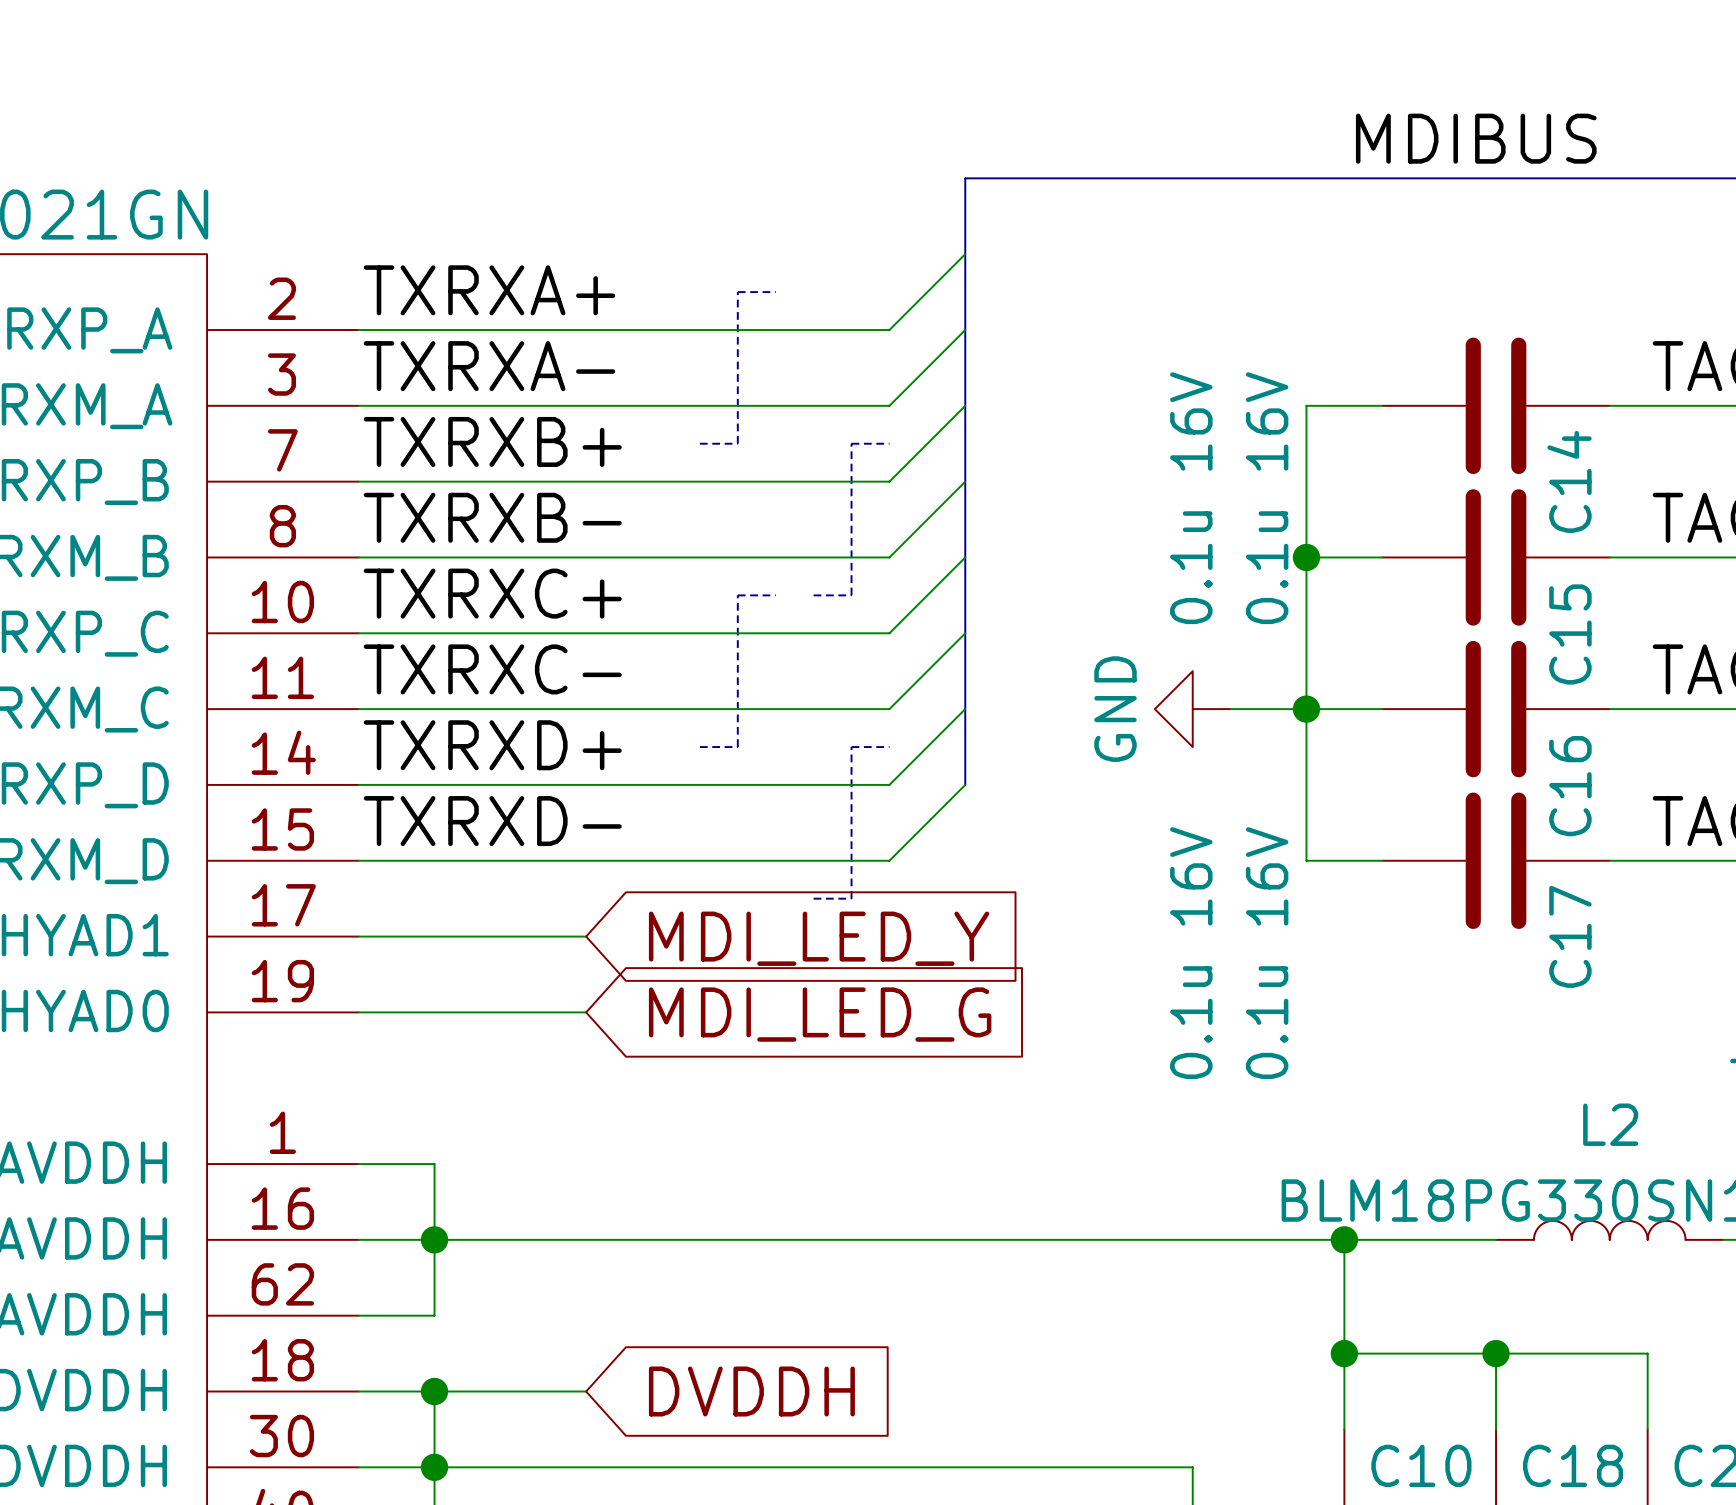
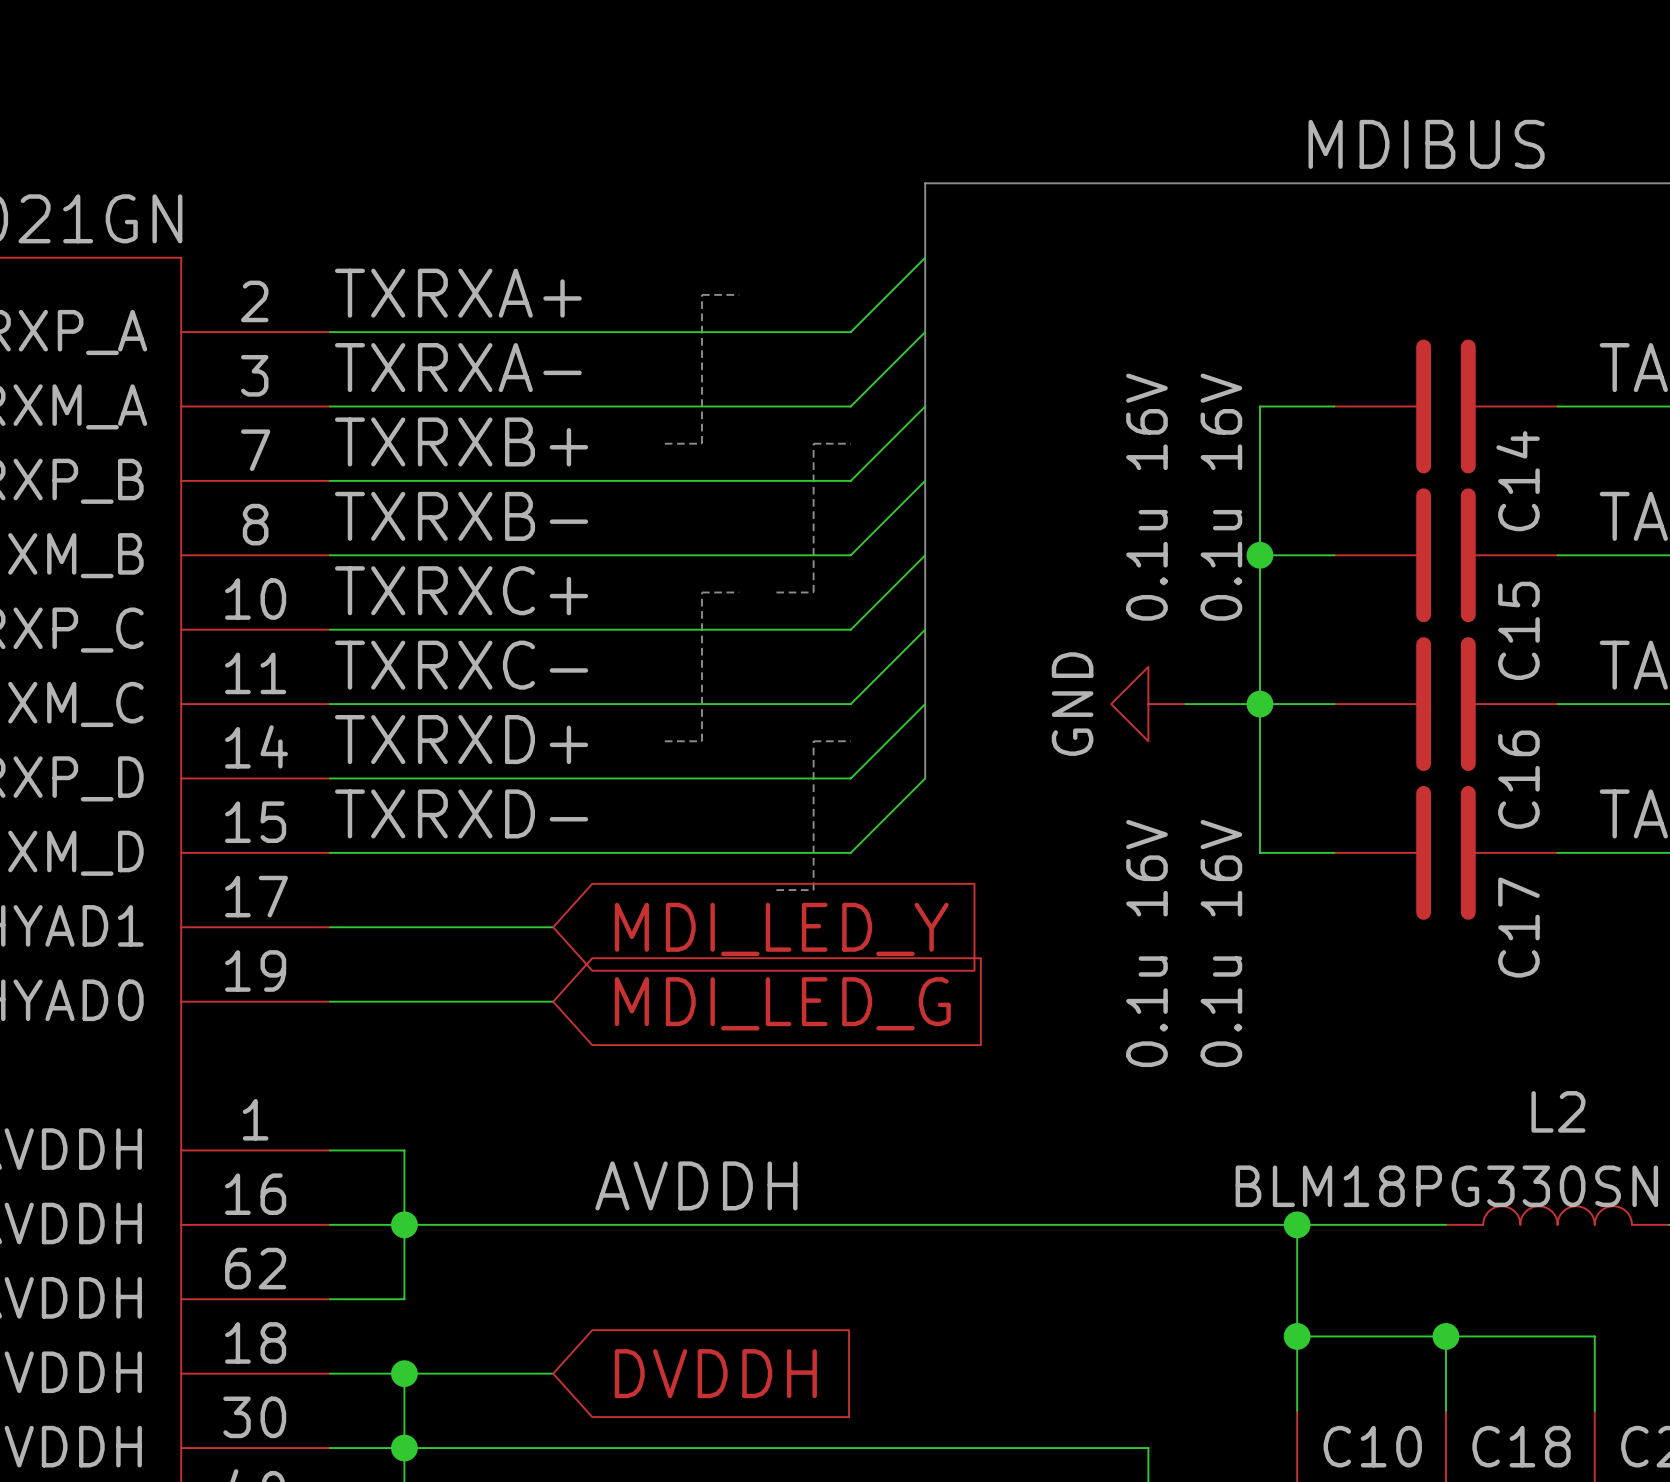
label: none -> AVDDH (696, 1185)

